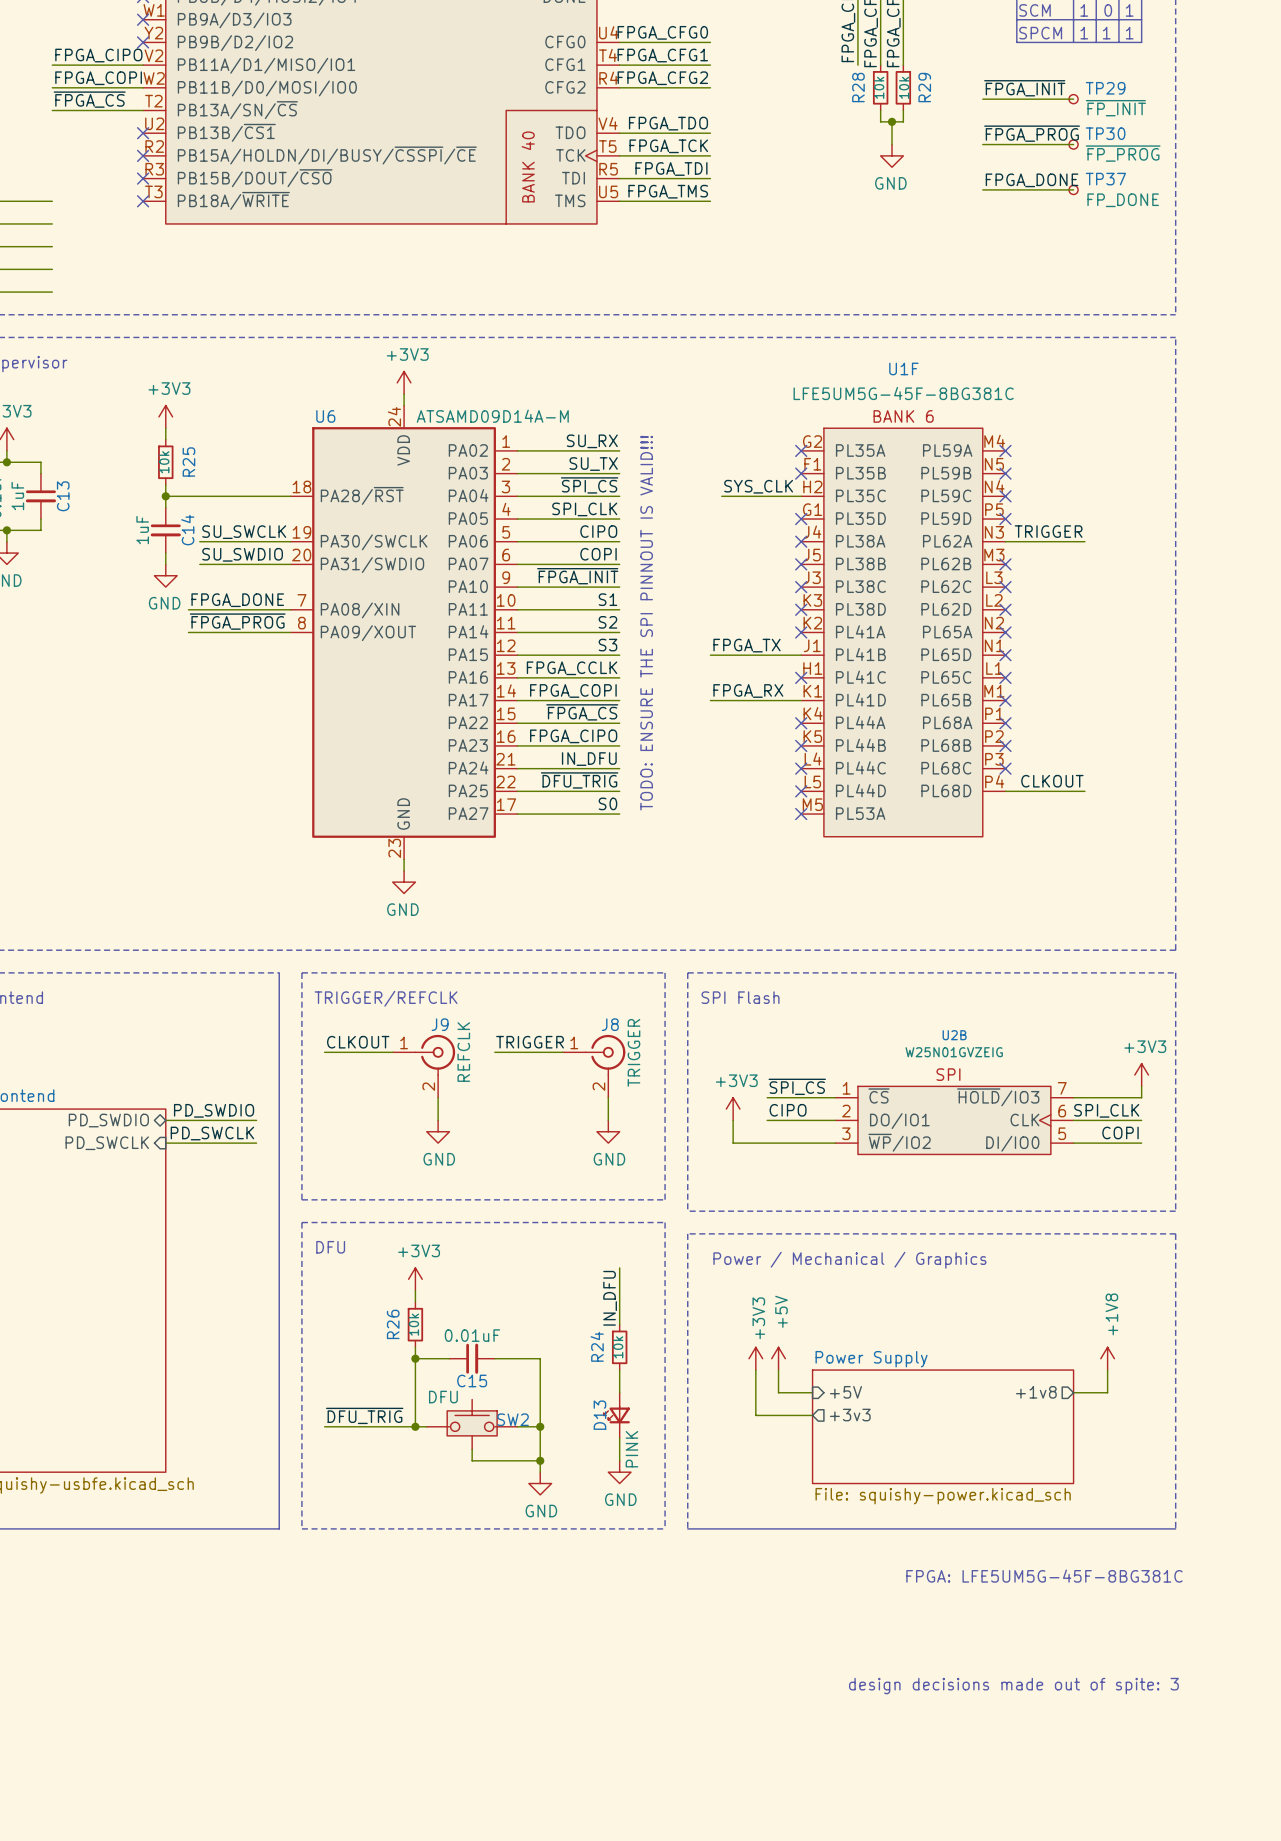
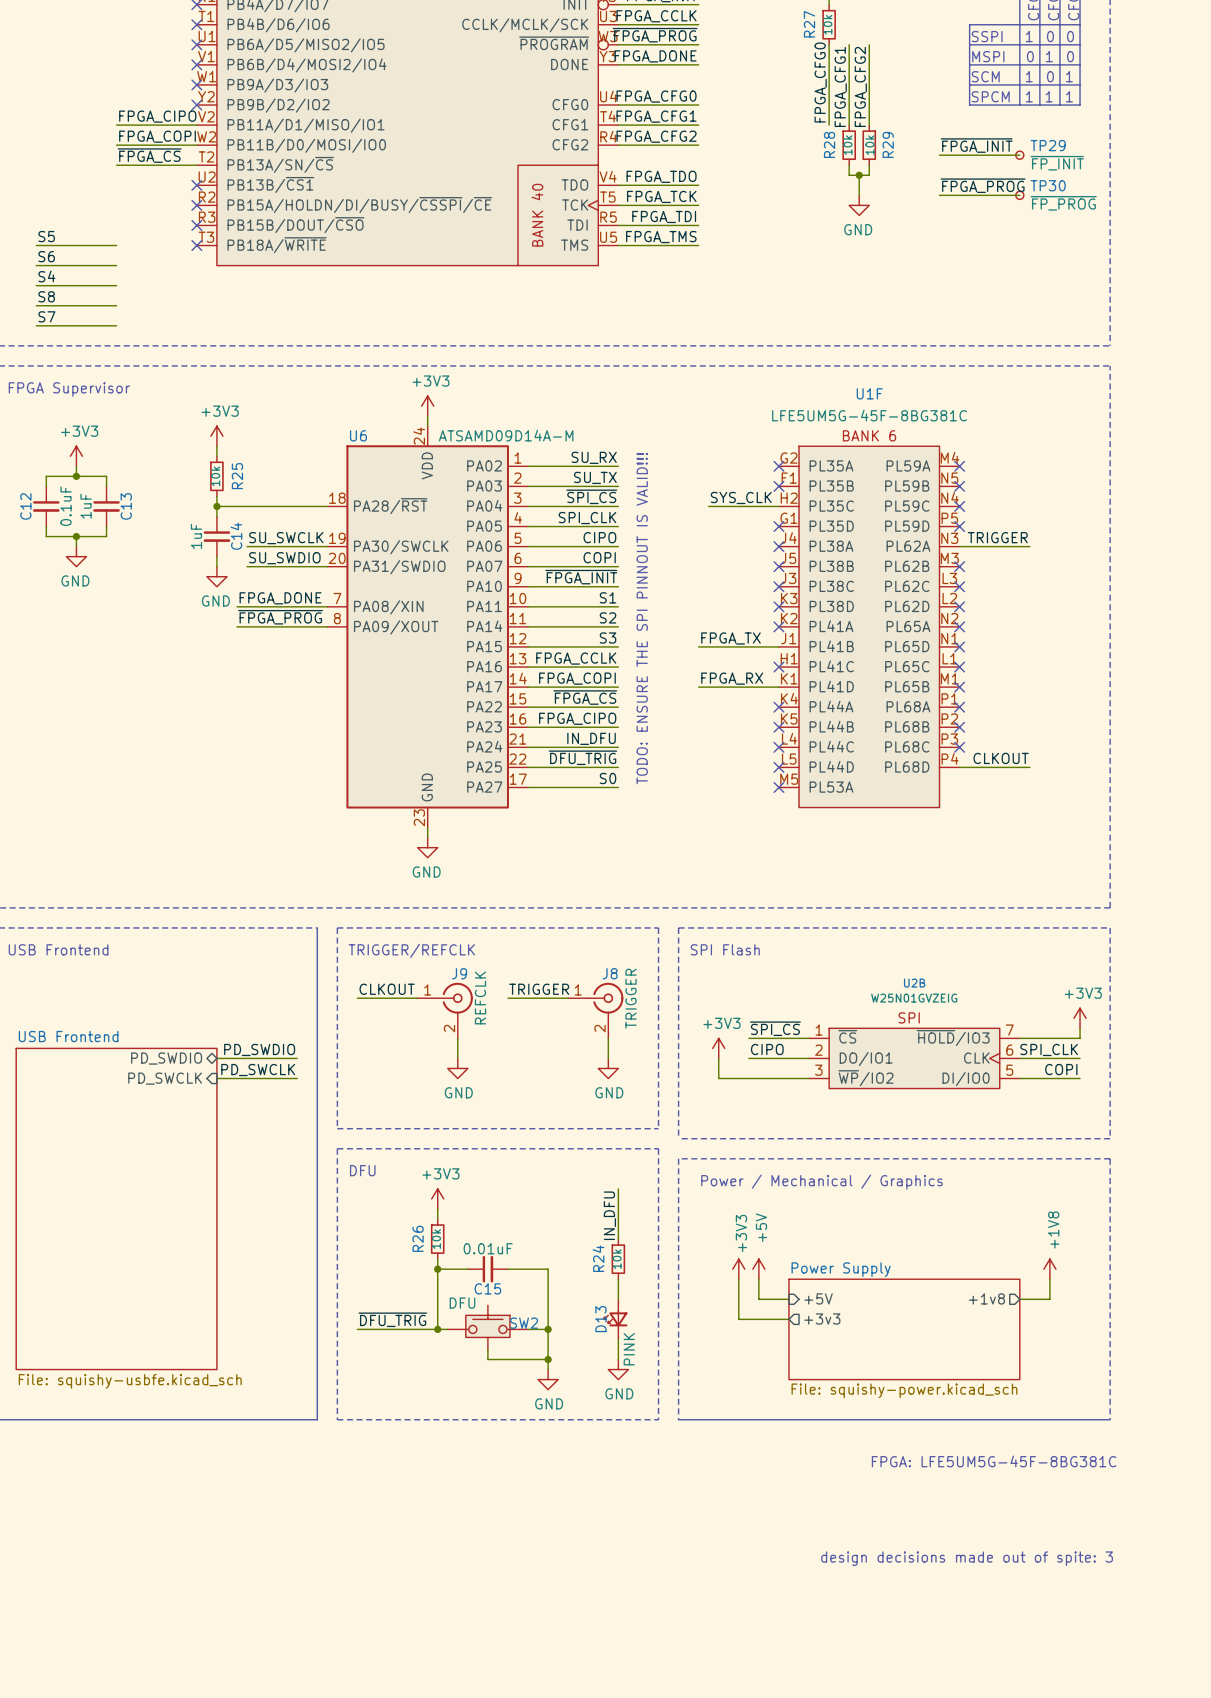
label: FPGA_DONE (1032, 180) -> none
wire: (982, 189) (1073, 189) -> none
TP37: FP_DONE (1073, 189) -> none

